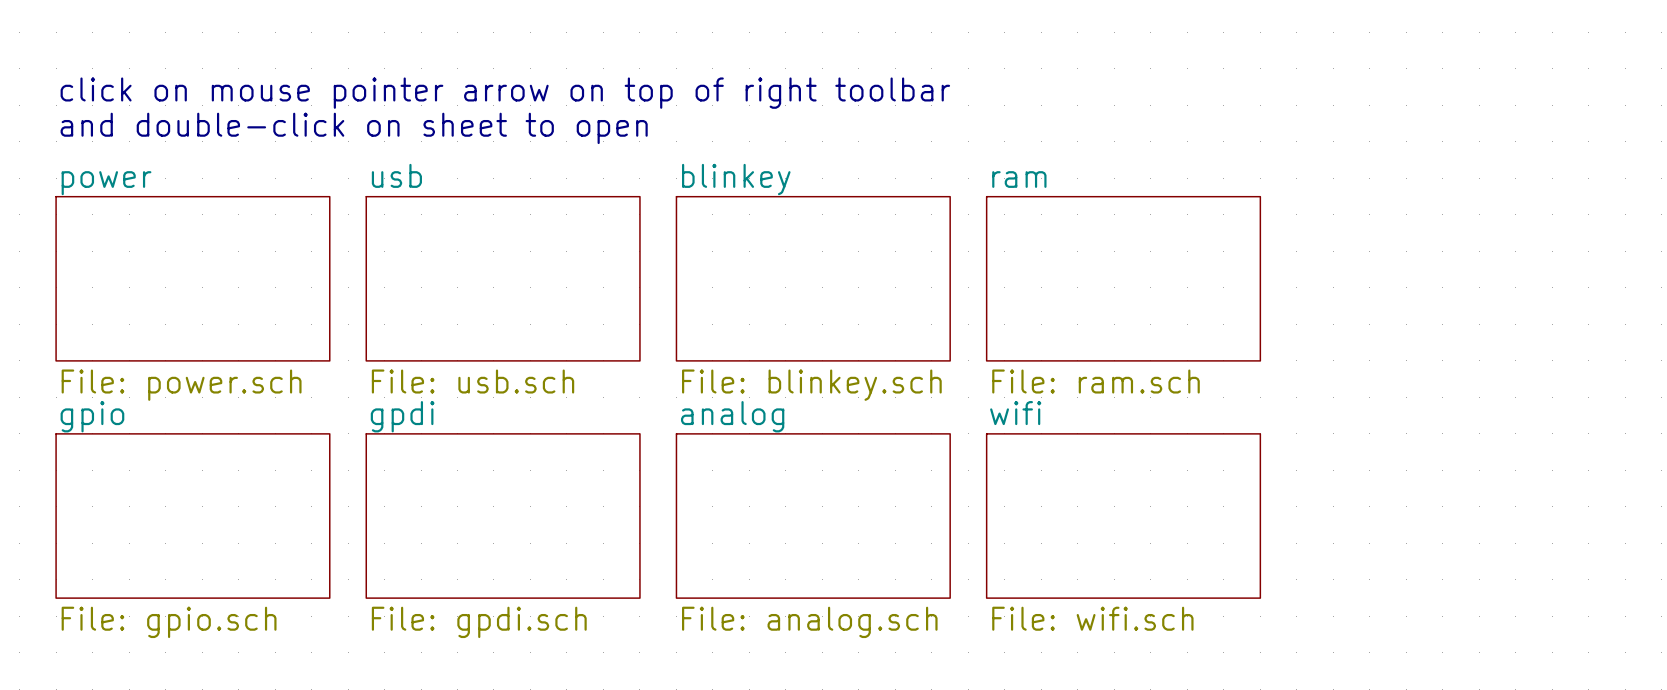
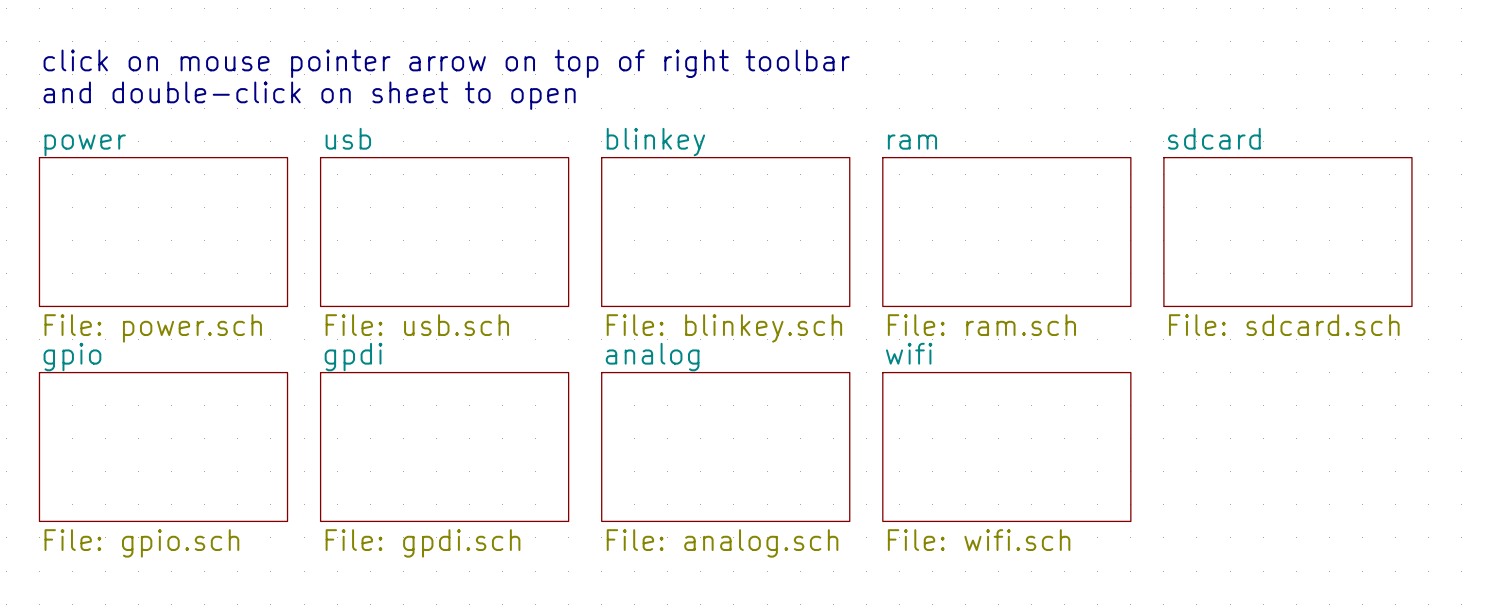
sheet sdcard: none -> File: sdcard.sch (1287, 232)

